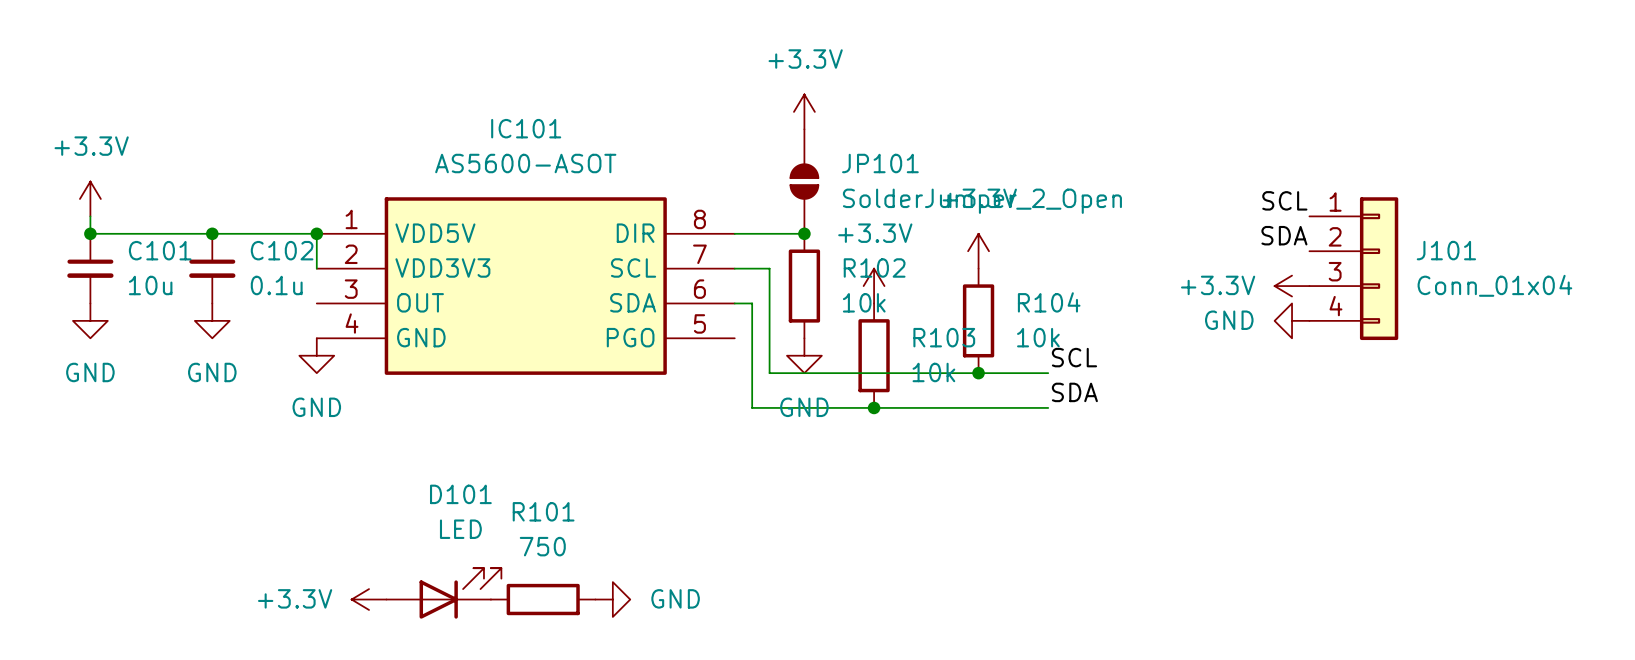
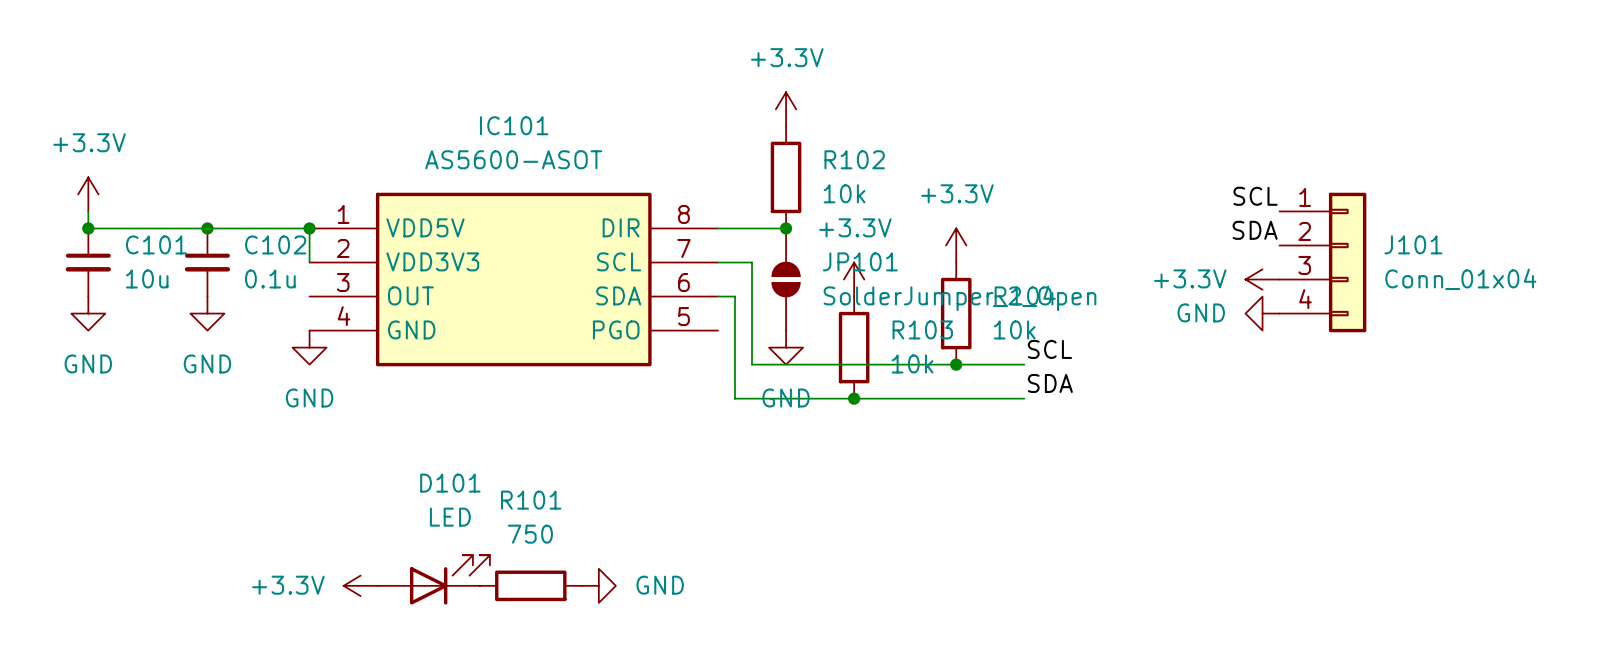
JP101 position: (804, 181) -> (786, 279)
R102 position: (804, 286) -> (786, 177)

